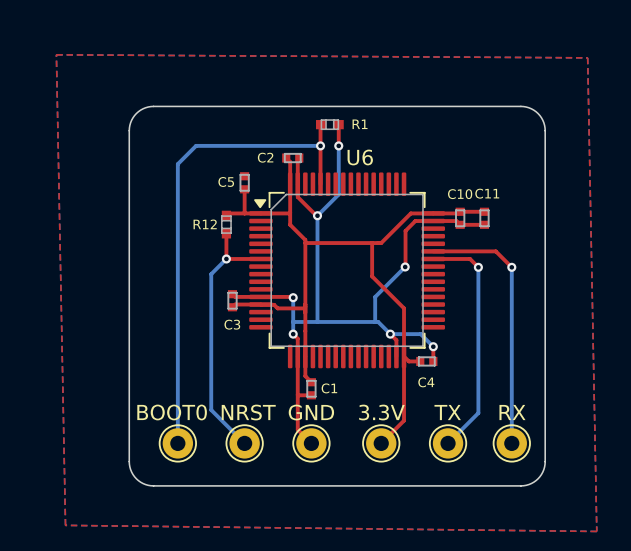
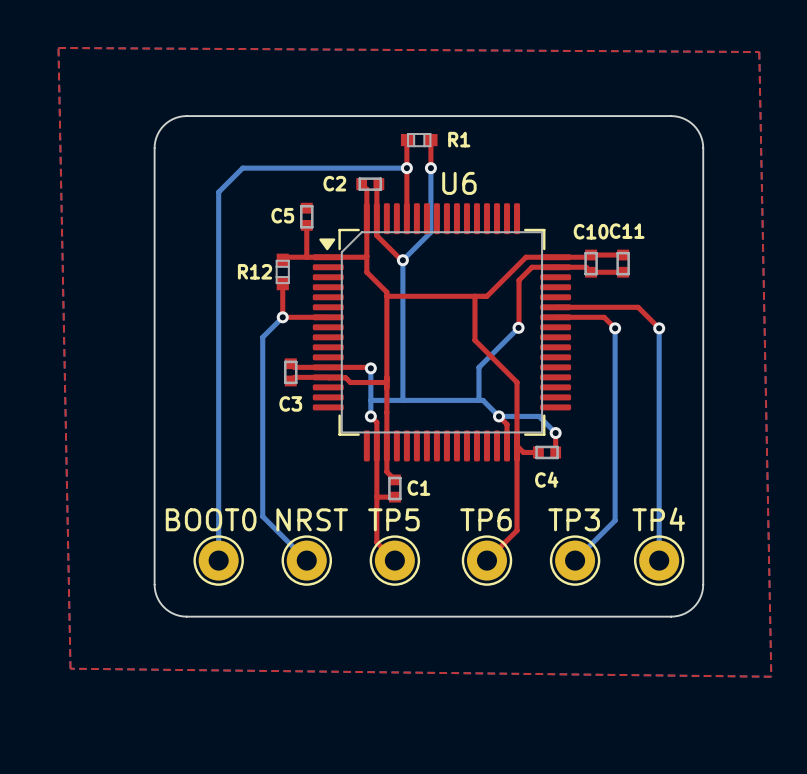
GND name: GND (311, 412) -> TP5 (393, 519)
3.3V name: 3.3V (381, 412) -> TP6 (486, 519)
TX name: TX (447, 412) -> TP3 (574, 519)
RX name: RX (512, 412) -> TP4 (658, 519)

